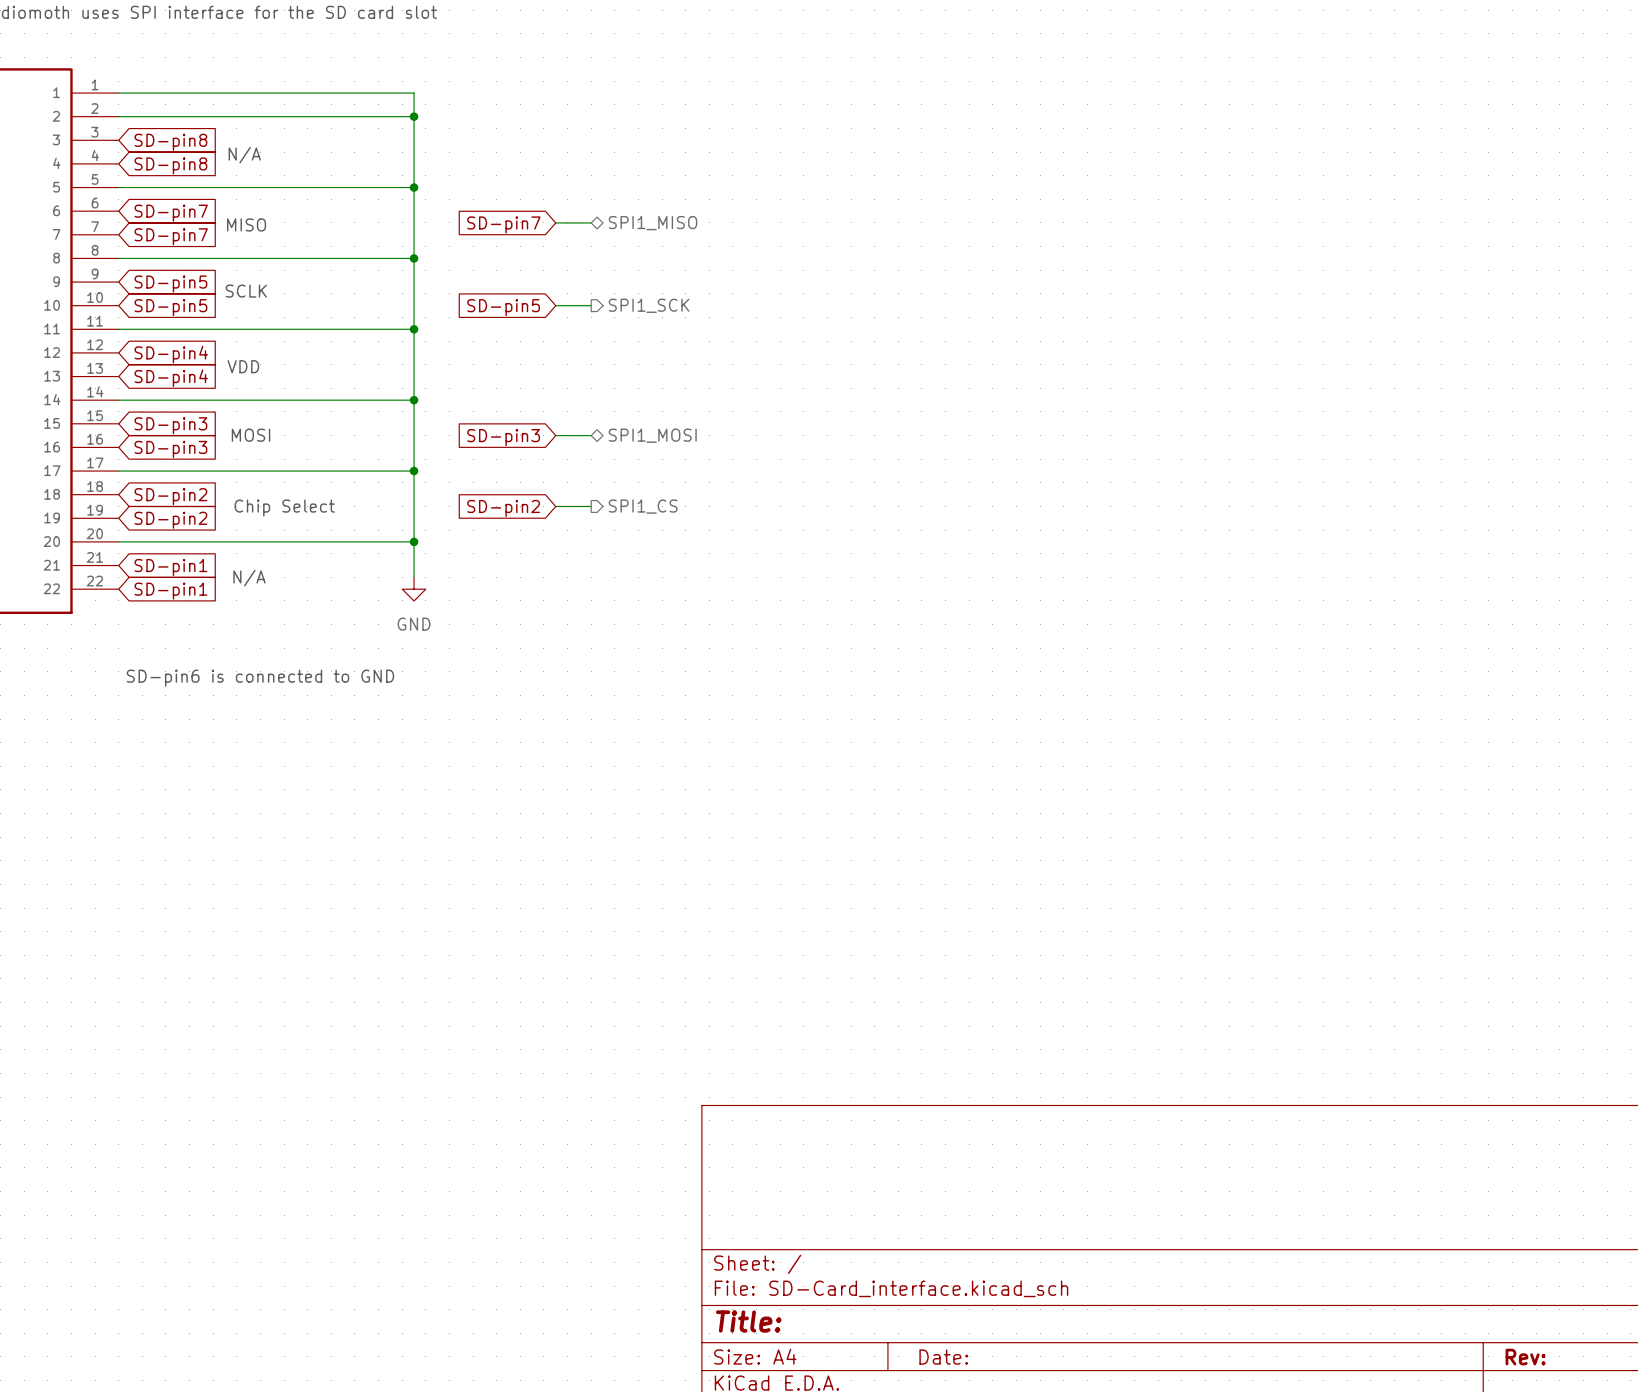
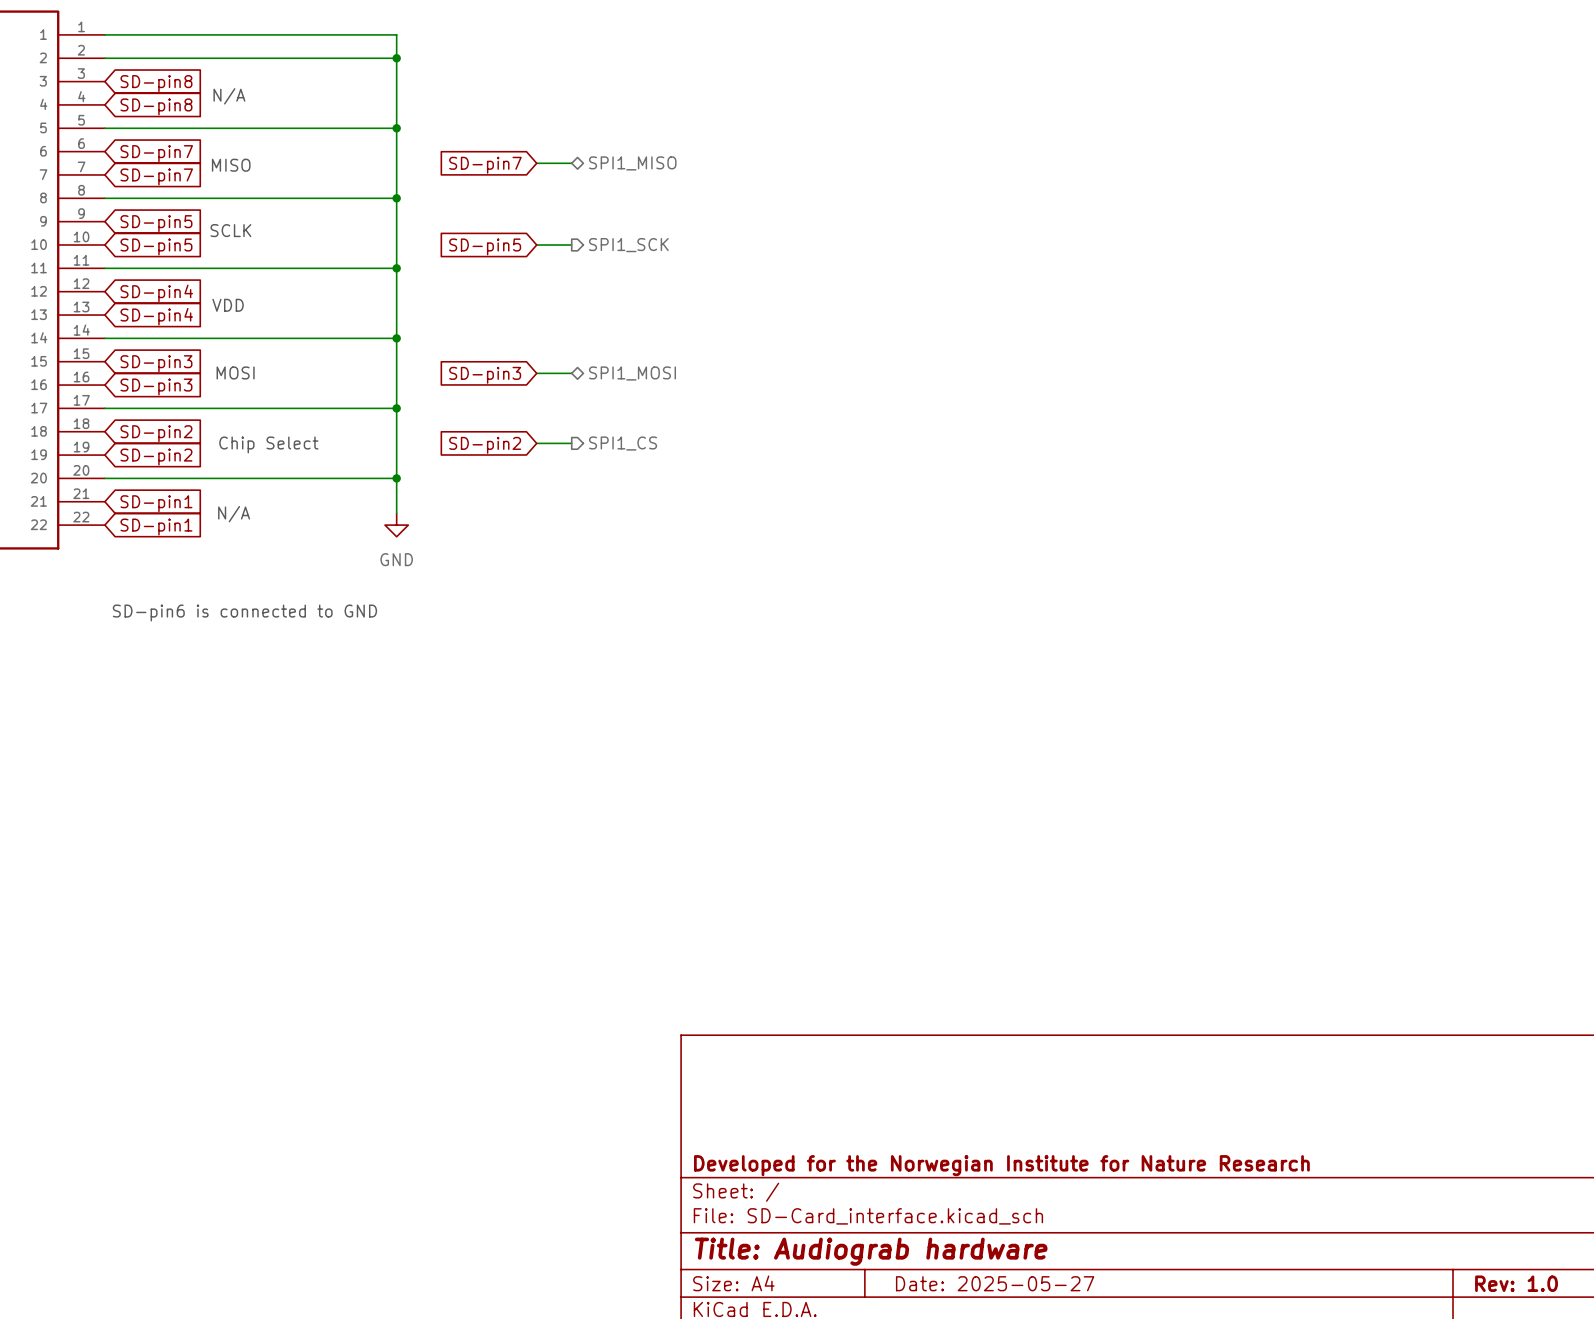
title block: none -> Developed for the Norwegian Institute for Nature Research (1001, 1165)
title block: Title: (748, 1321) -> Title: Audiograb hardware (871, 1251)
title block: Date: (943, 1357) -> Date: 2025-05-27 (995, 1283)
title block: Rev: (1525, 1357) -> Rev: 1.0 (1516, 1283)

